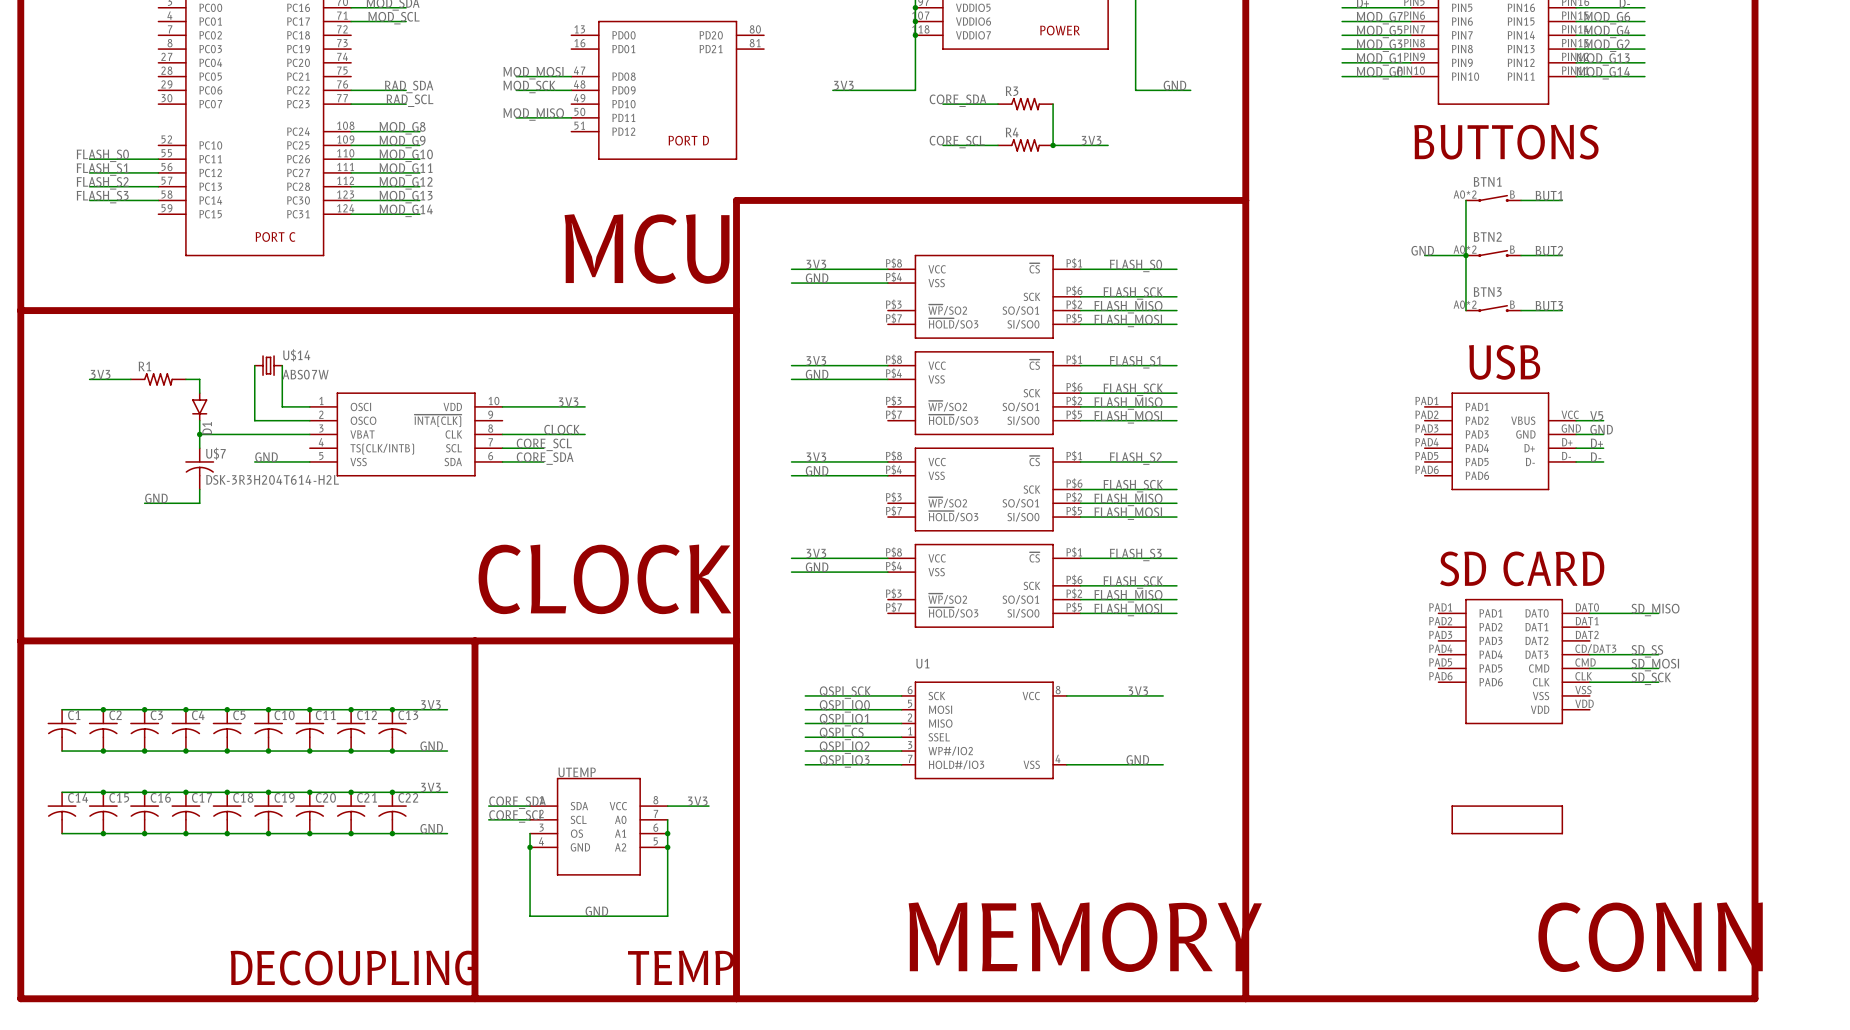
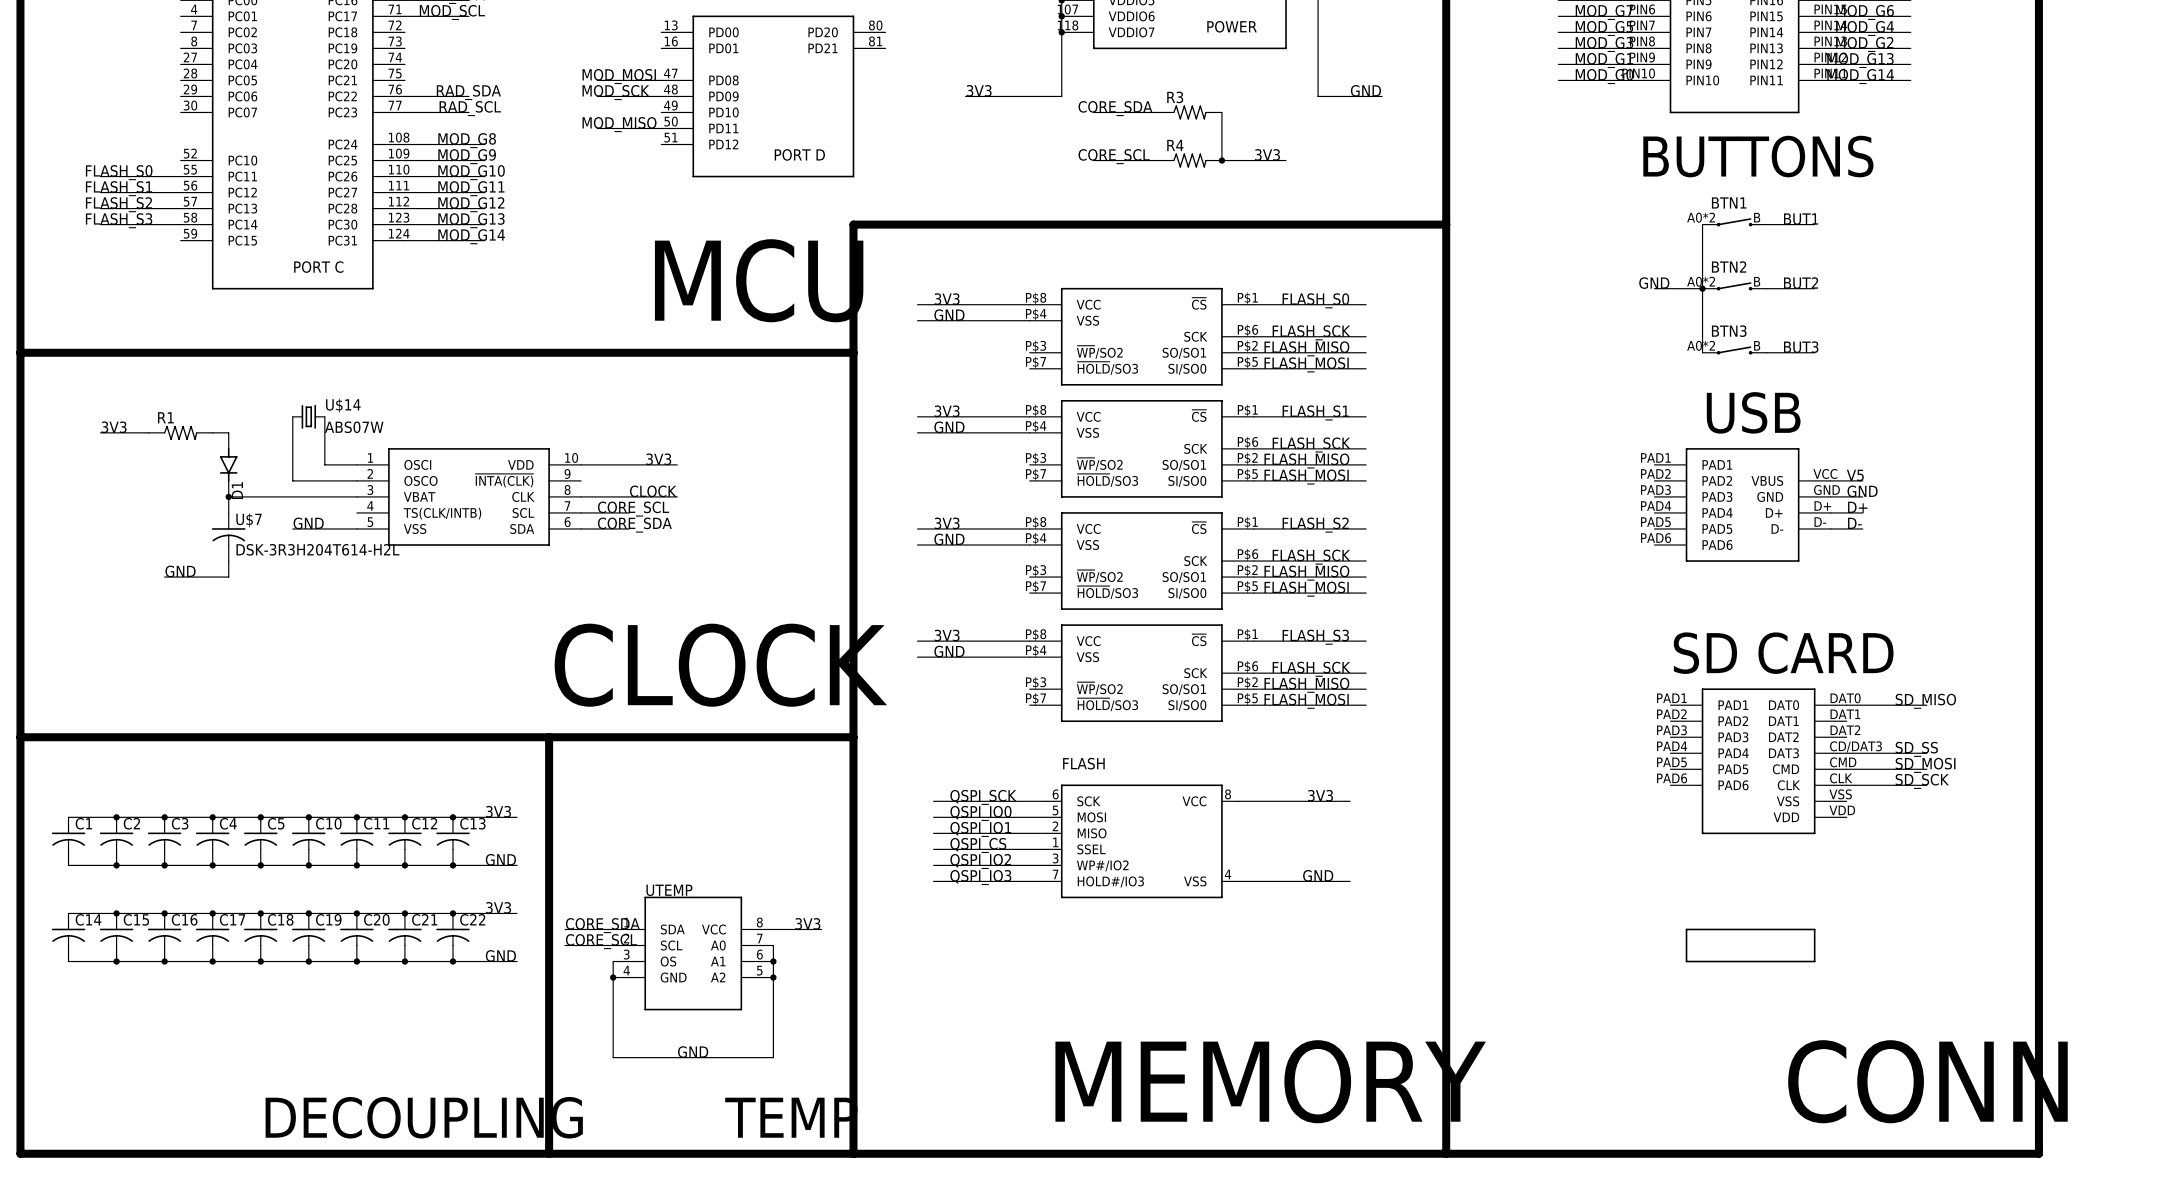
U1 name: U1 (922, 663) -> FLASH (1083, 763)

